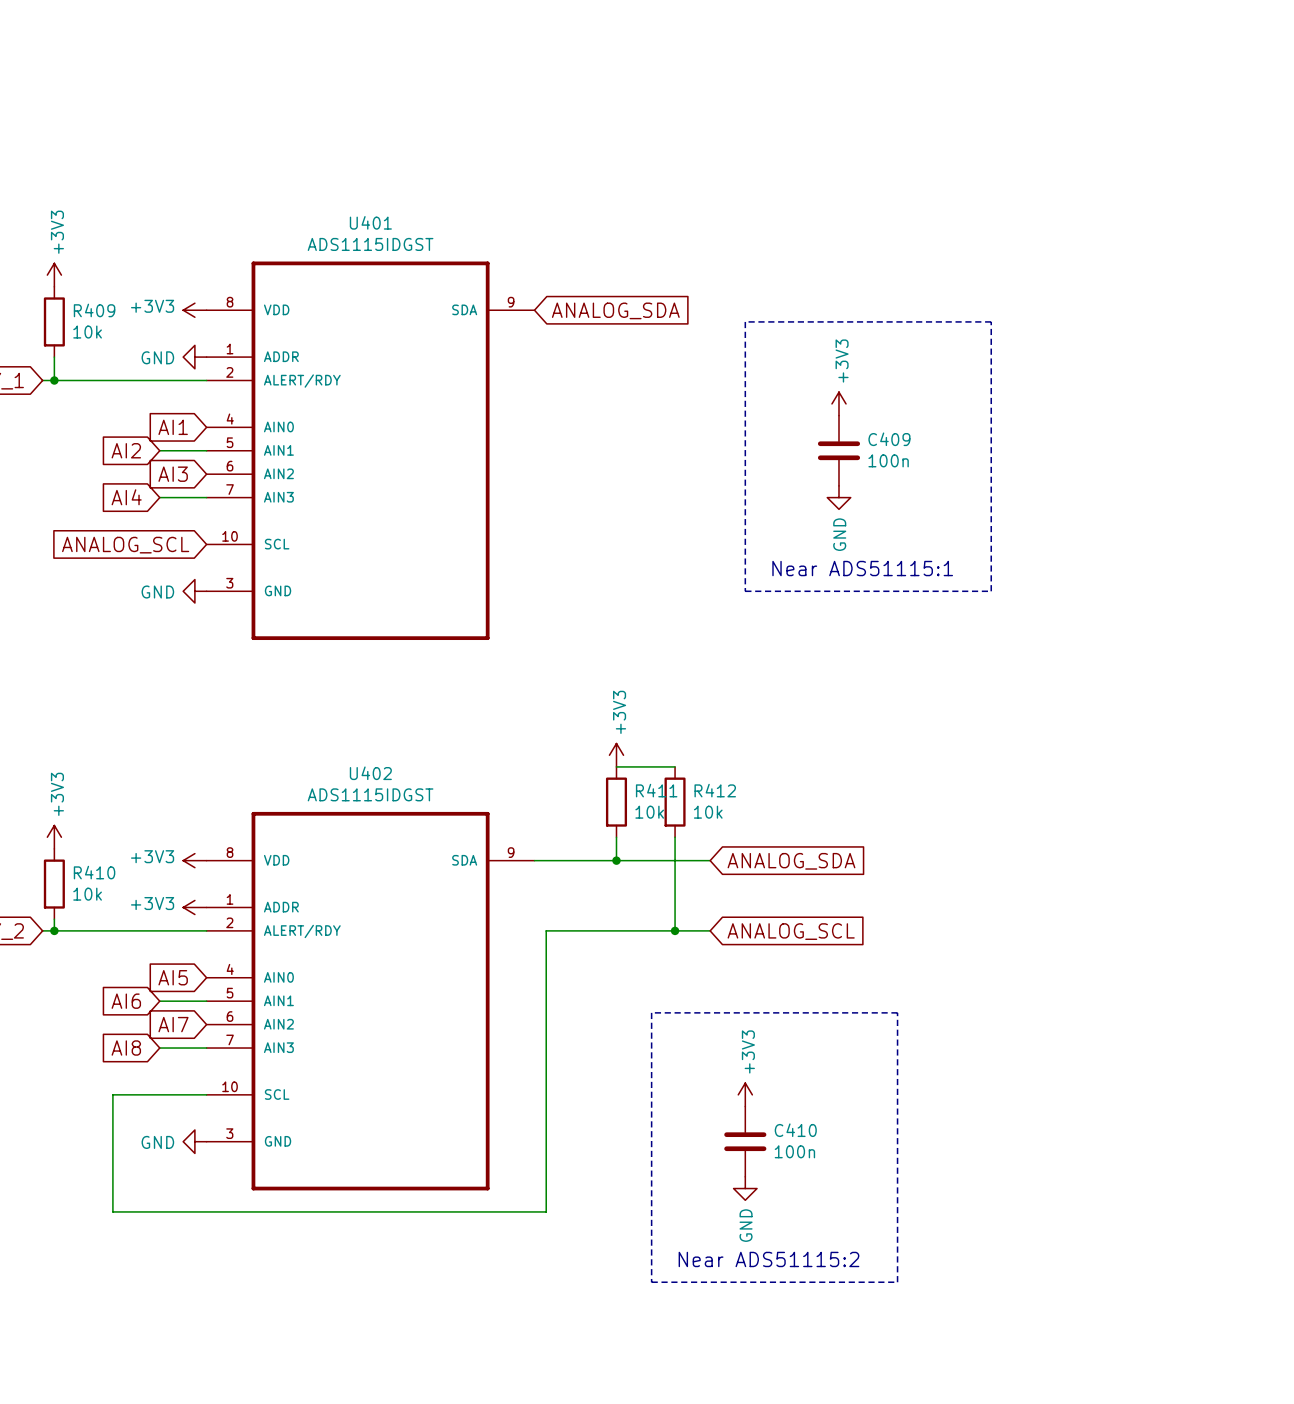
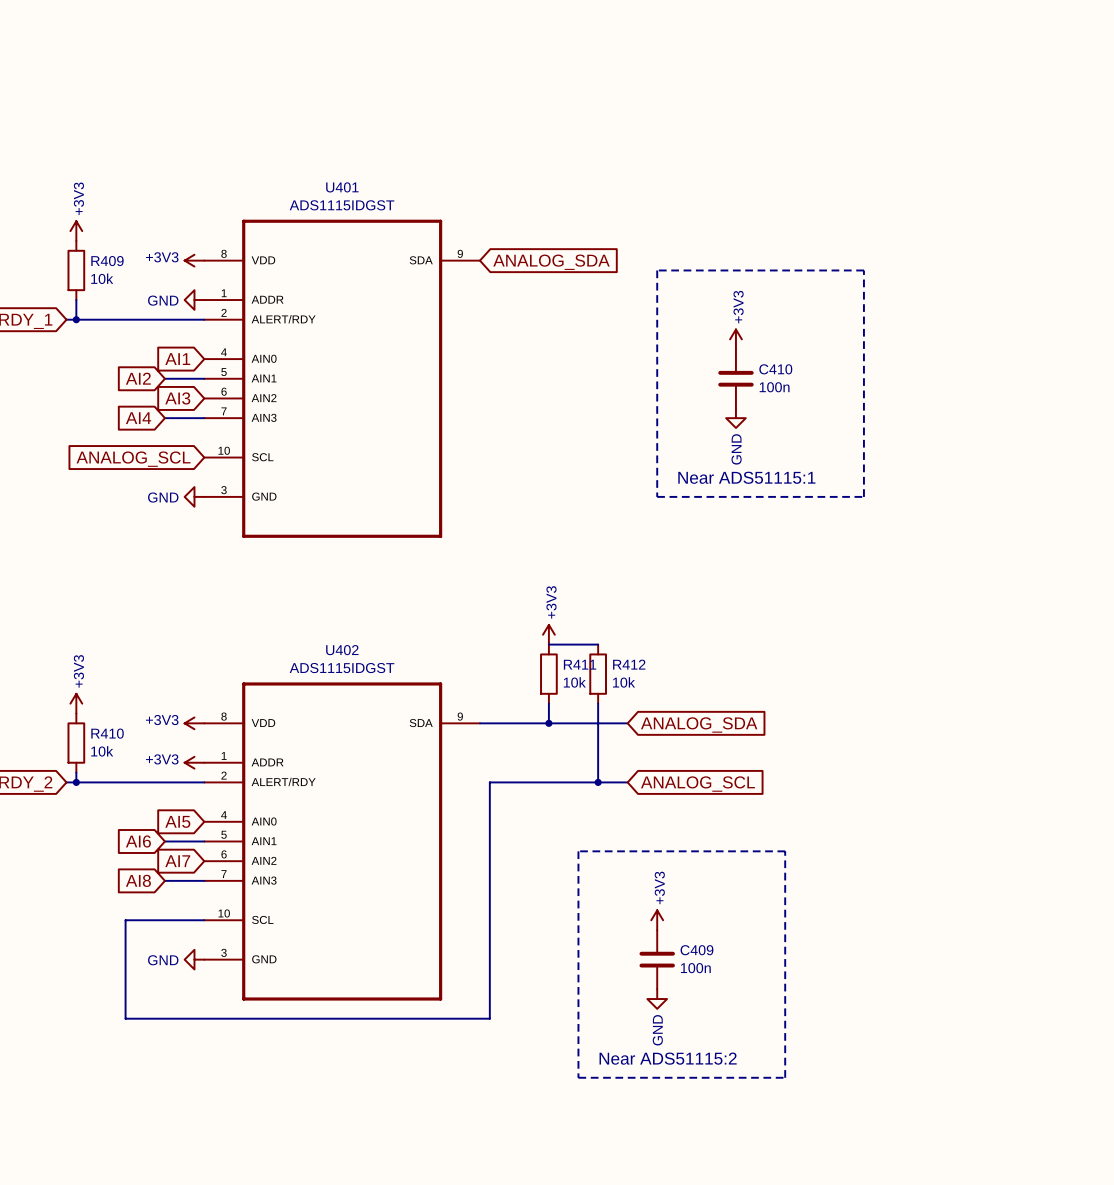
C409 name: C409 (889, 439) -> C410 (775, 369)
C410 name: C410 (795, 1130) -> C409 (696, 950)

